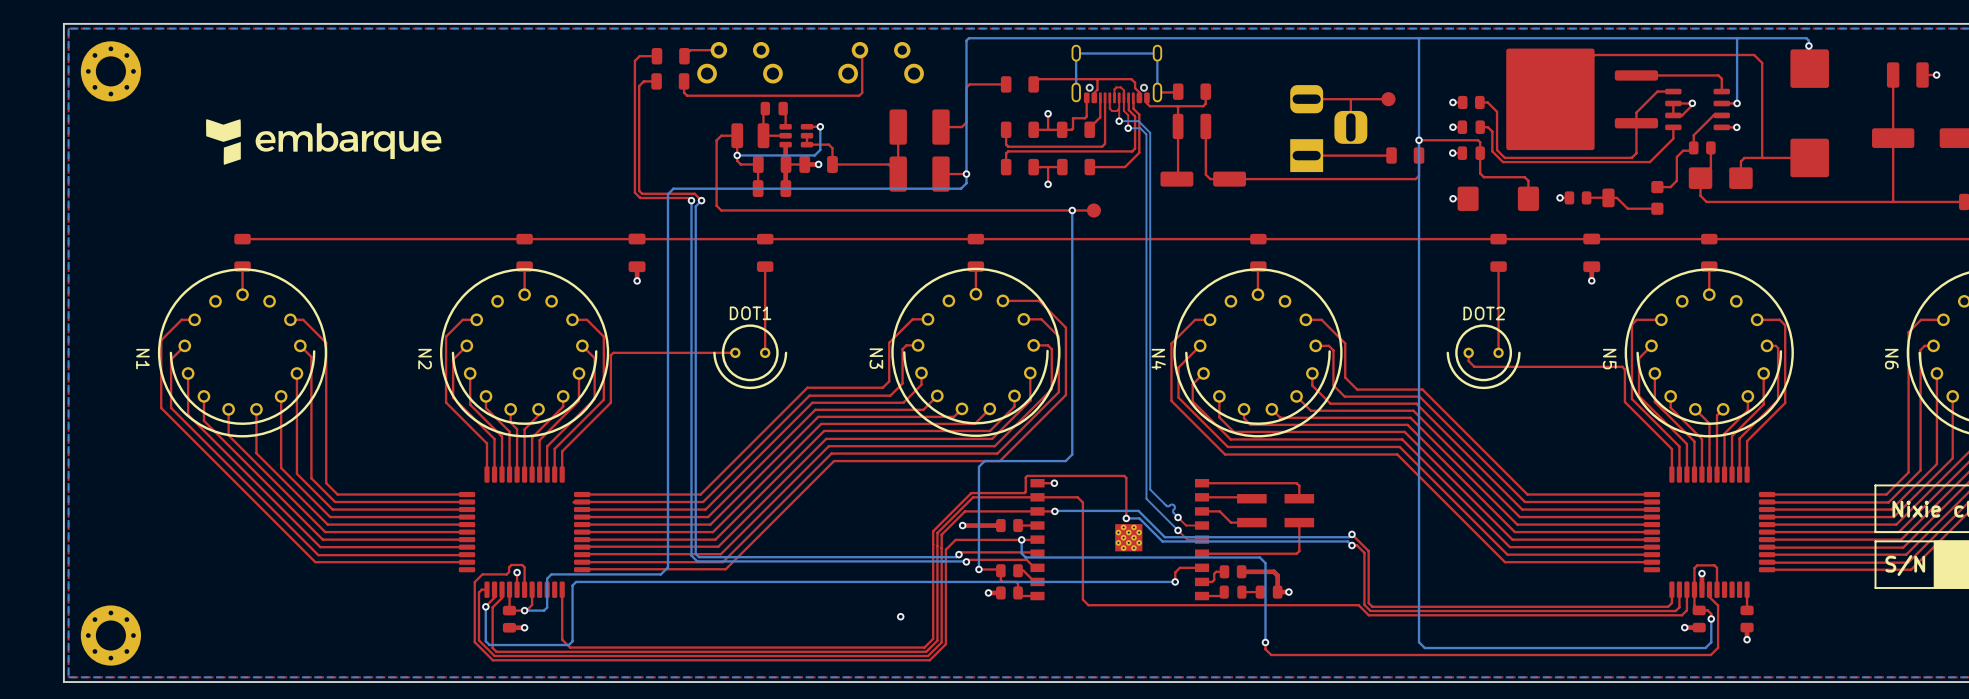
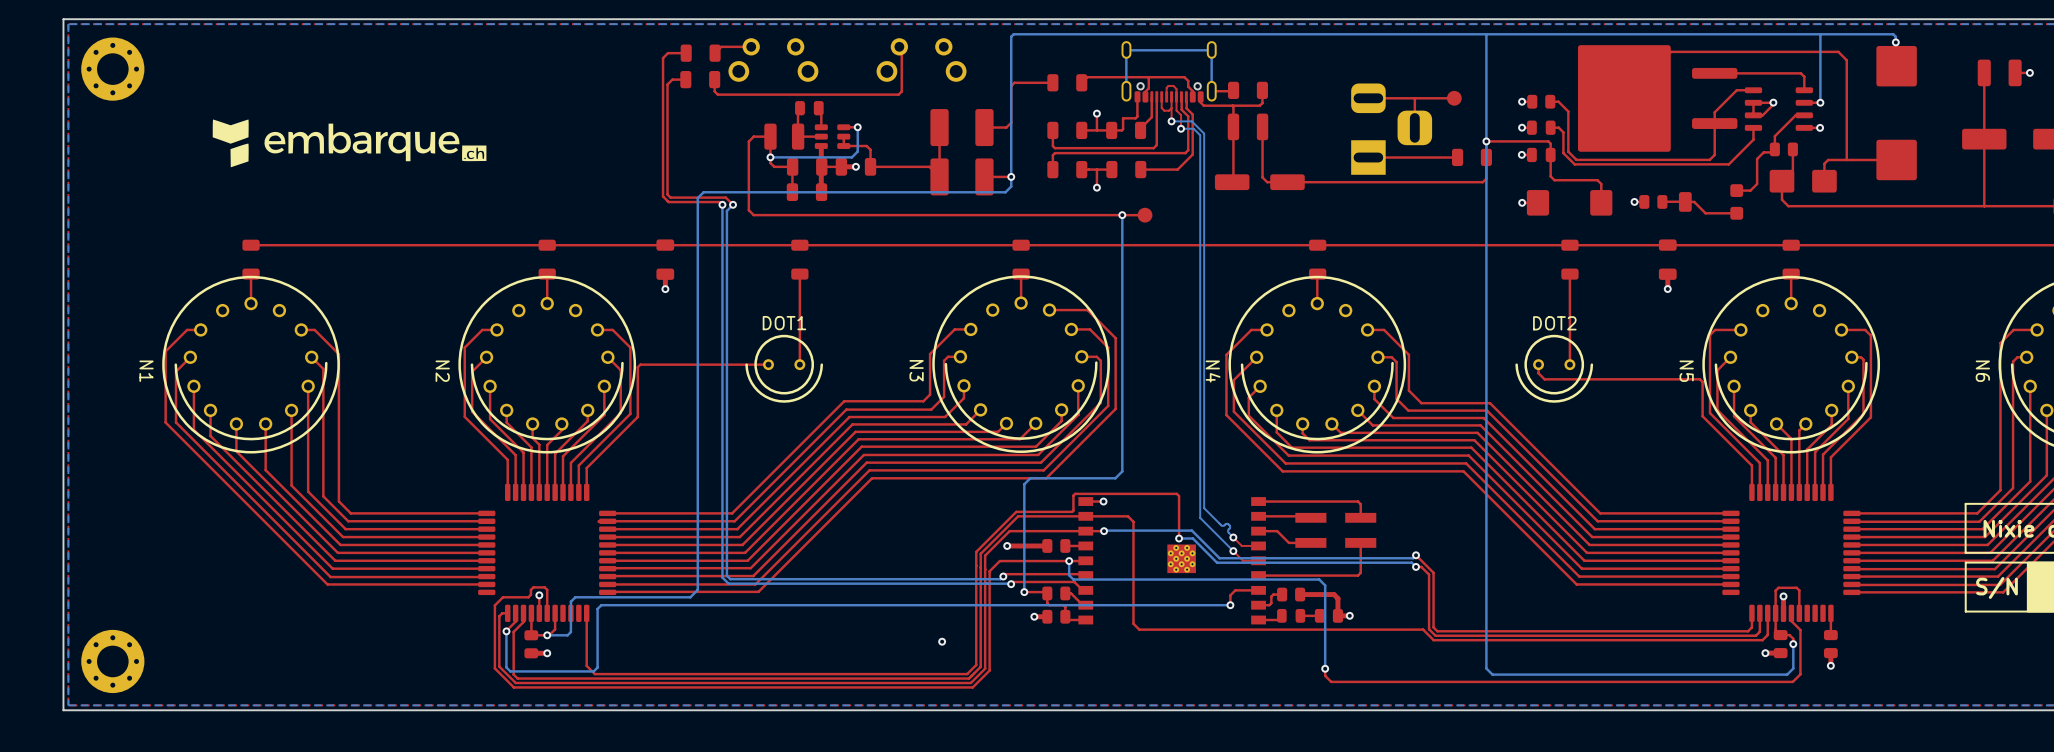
drawing: [206, 119, 442, 165] -> none
drawing: none -> [212, 119, 487, 168]

